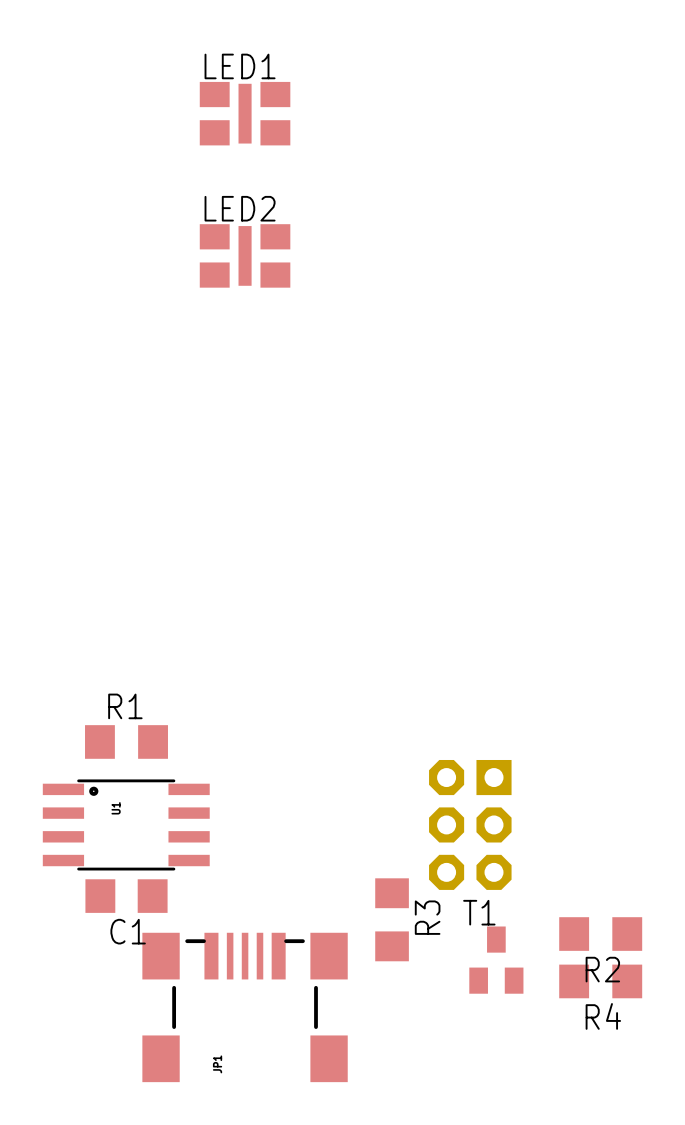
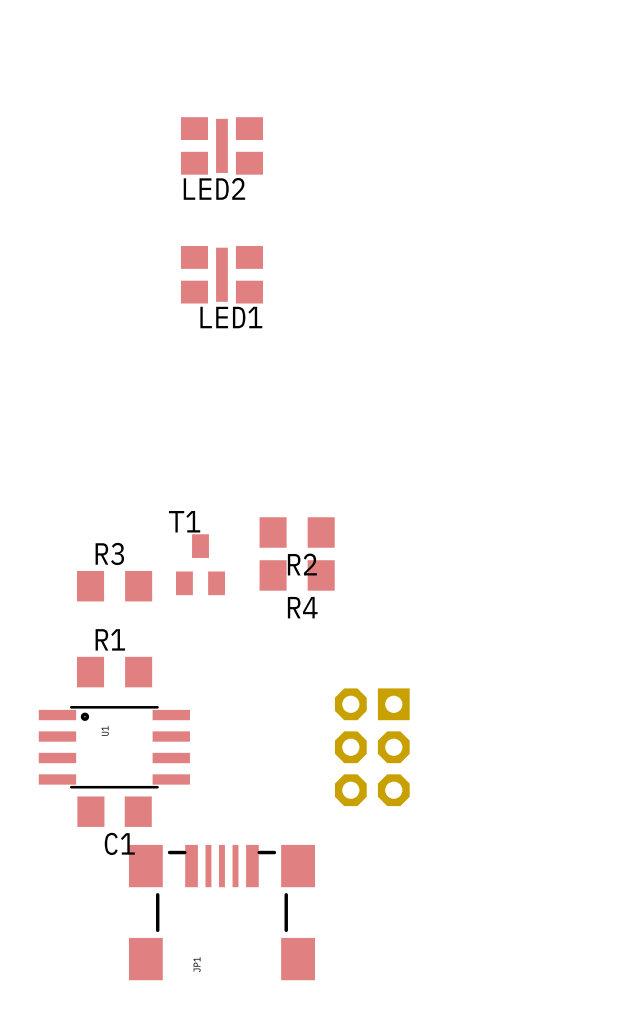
LED1 name position: LED1 (240, 66) -> LED1 (231, 317)
LED1 position: (245, 113) -> (221, 274)
LED2 position: (245, 255) -> (221, 145)
part position: (470, 824) -> (372, 747)
R3 name position: R3 (427, 917) -> R3 (109, 553)
R3 rotation: 0° (392, 919) -> 90° clockwise (114, 586)
R3 position: (392, 919) -> (114, 586)
R2 position: (600, 934) -> (297, 532)
T1 position: (496, 960) -> (200, 564)
R4 position: (600, 981) -> (297, 575)

